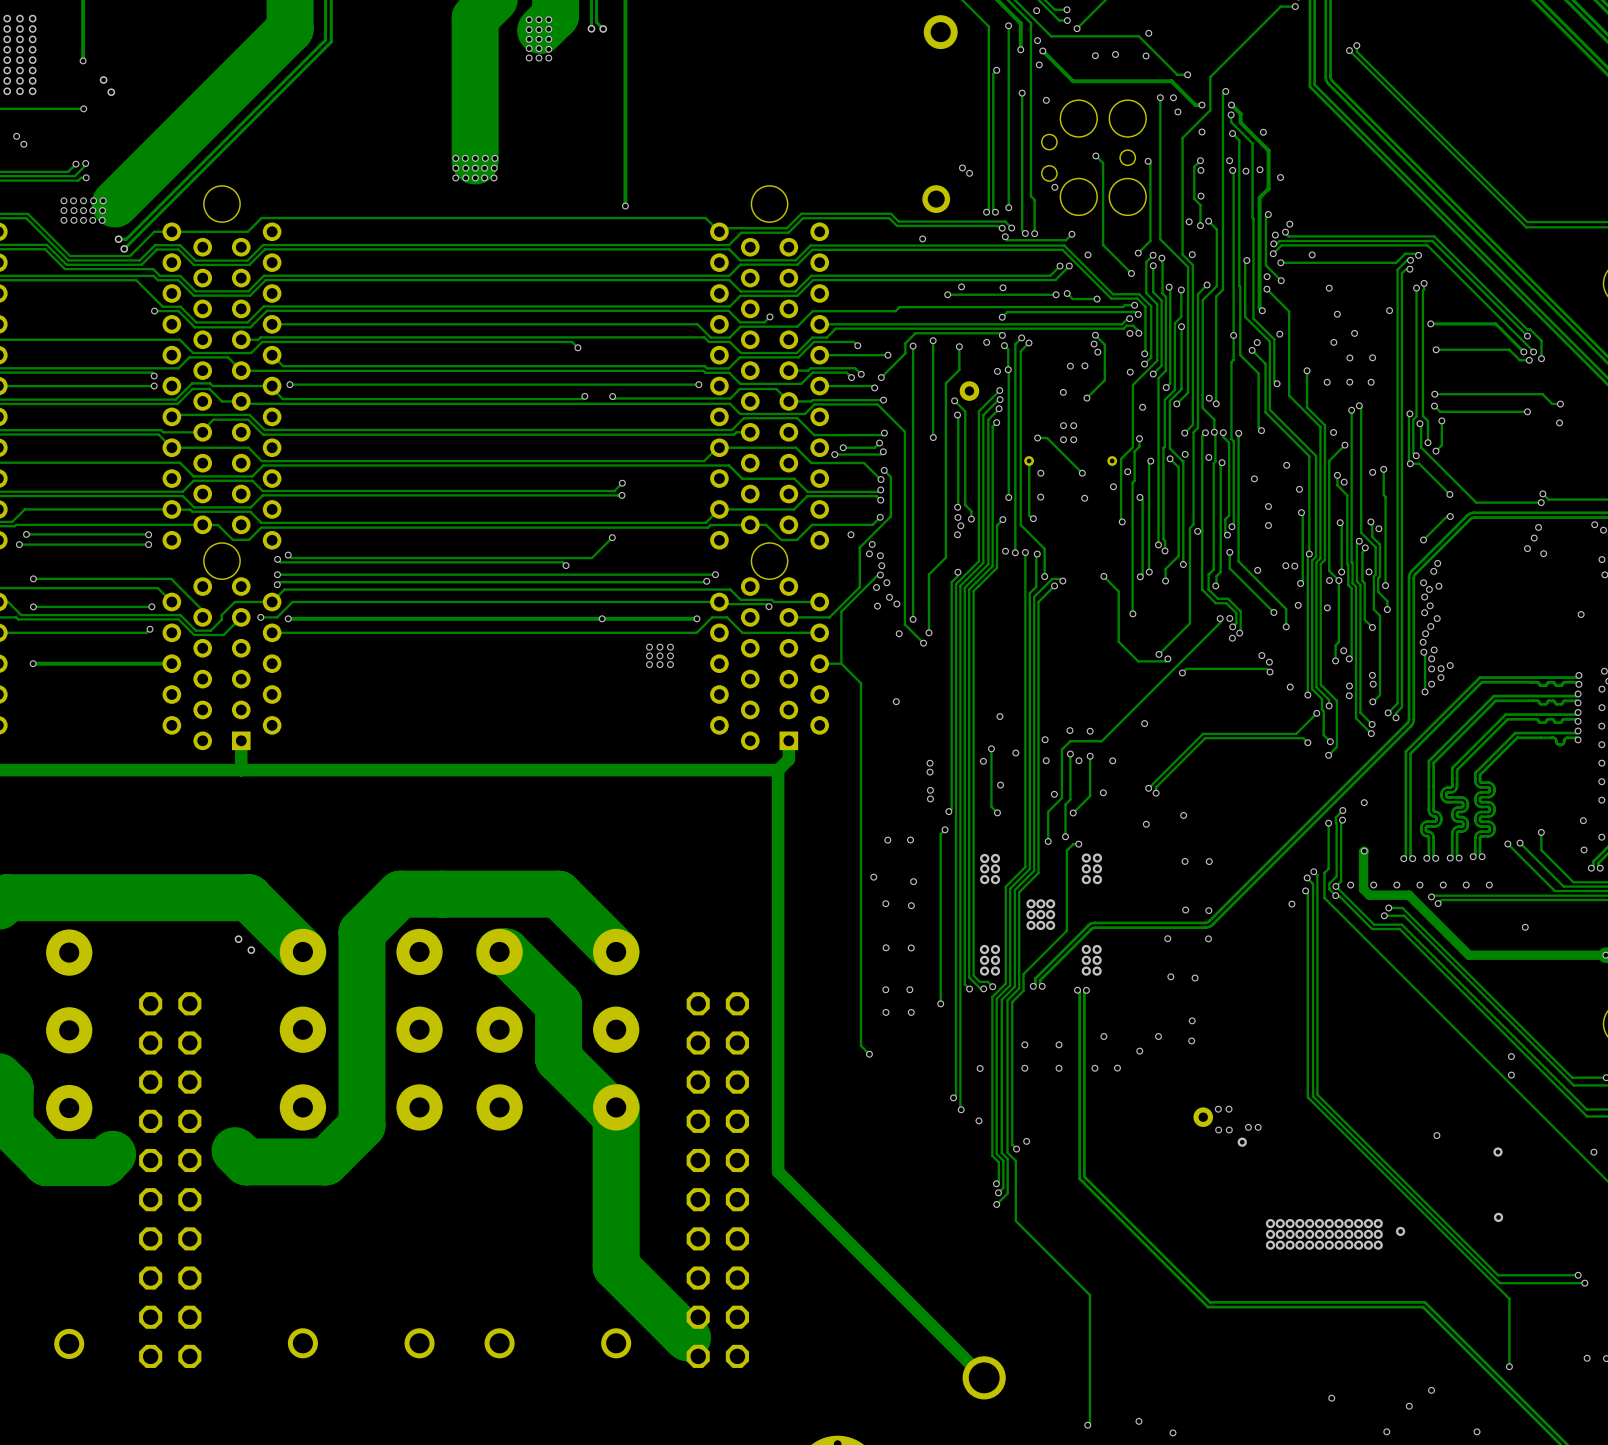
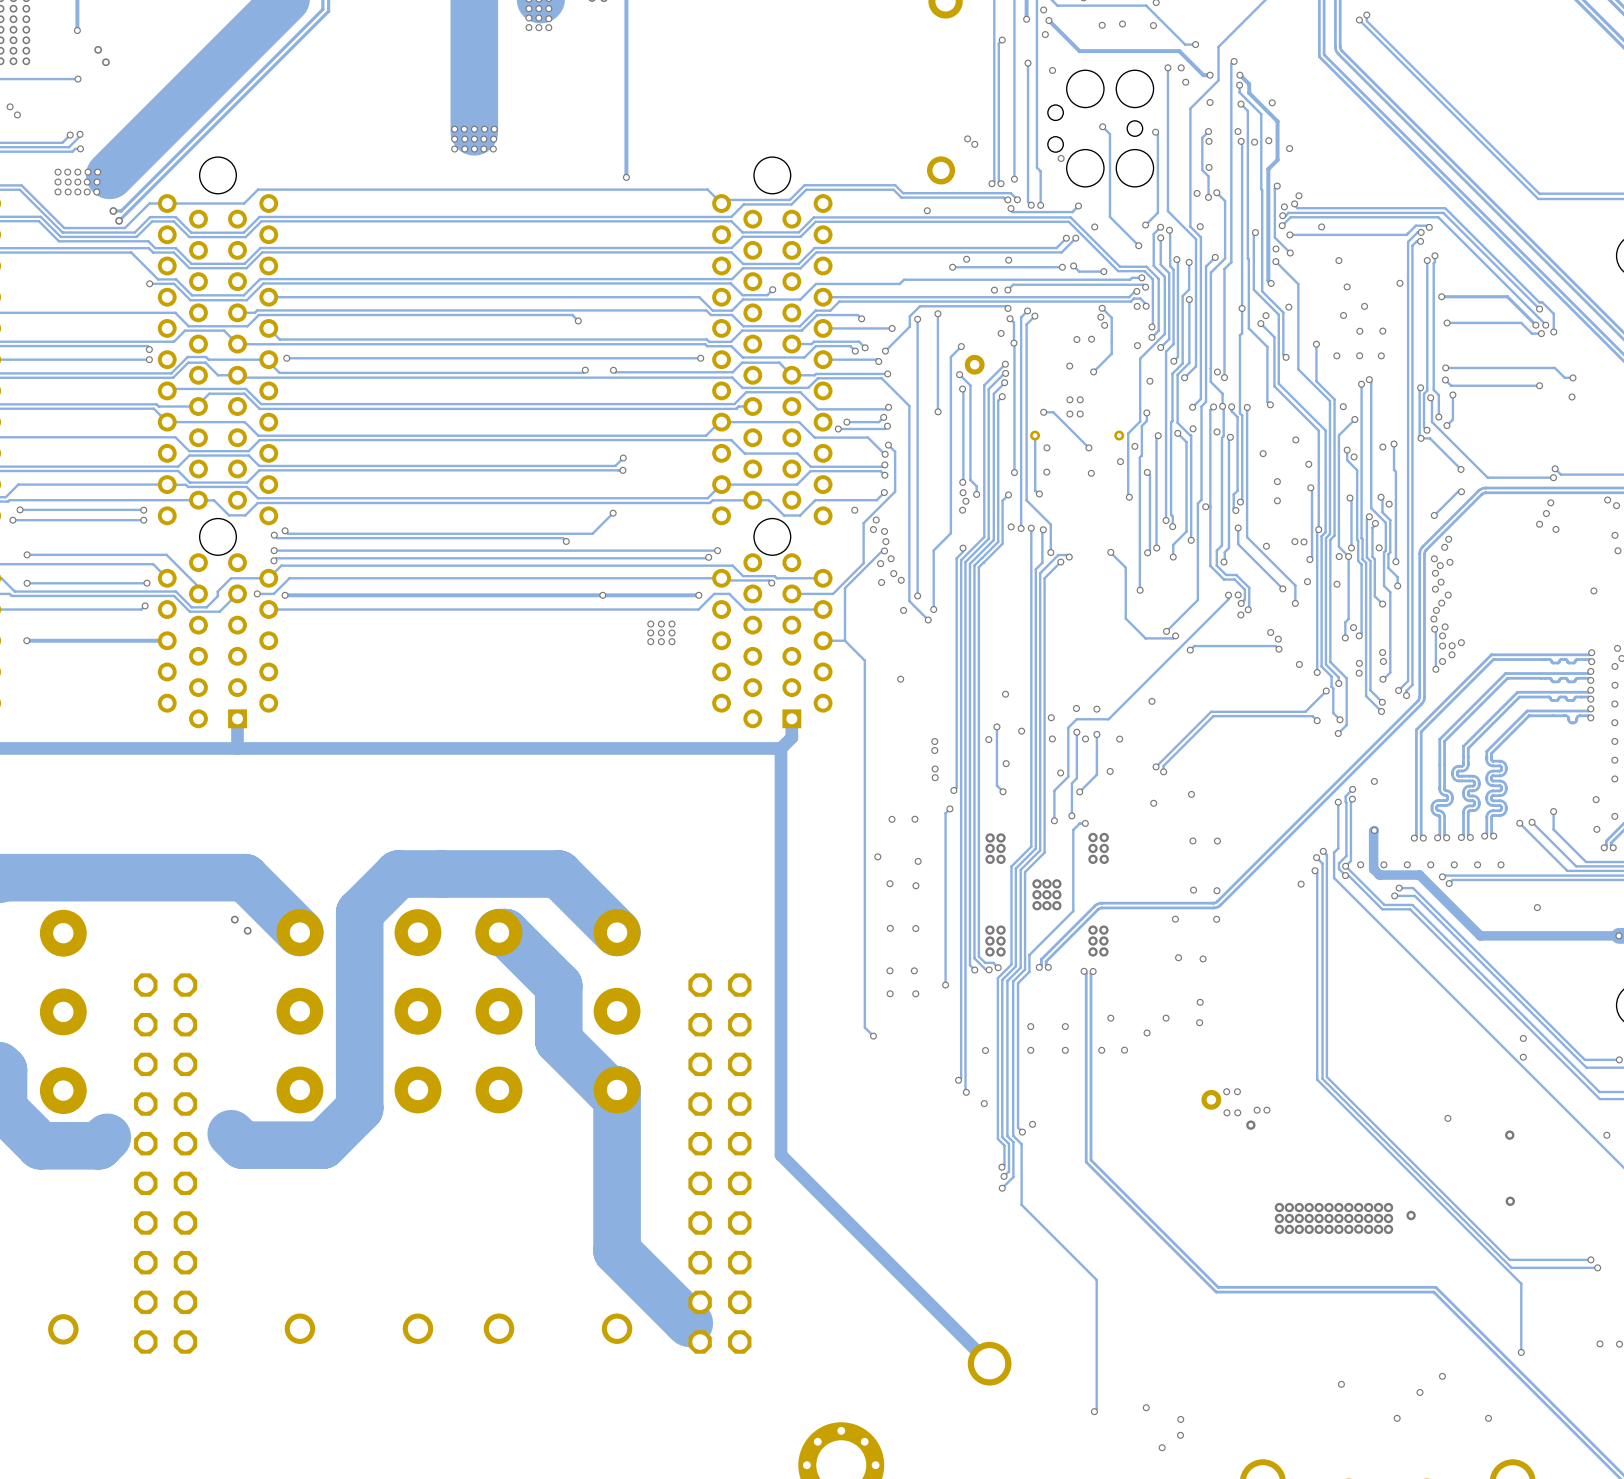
via: none -> (994, 290)
via: (986, 342) -> none
track: (959, 346) (959, 369) (956, 373) -> none
via: (959, 346) -> none
via: none -> (1001, 333)
via: (997, 371) -> none
via: none -> (961, 346)

